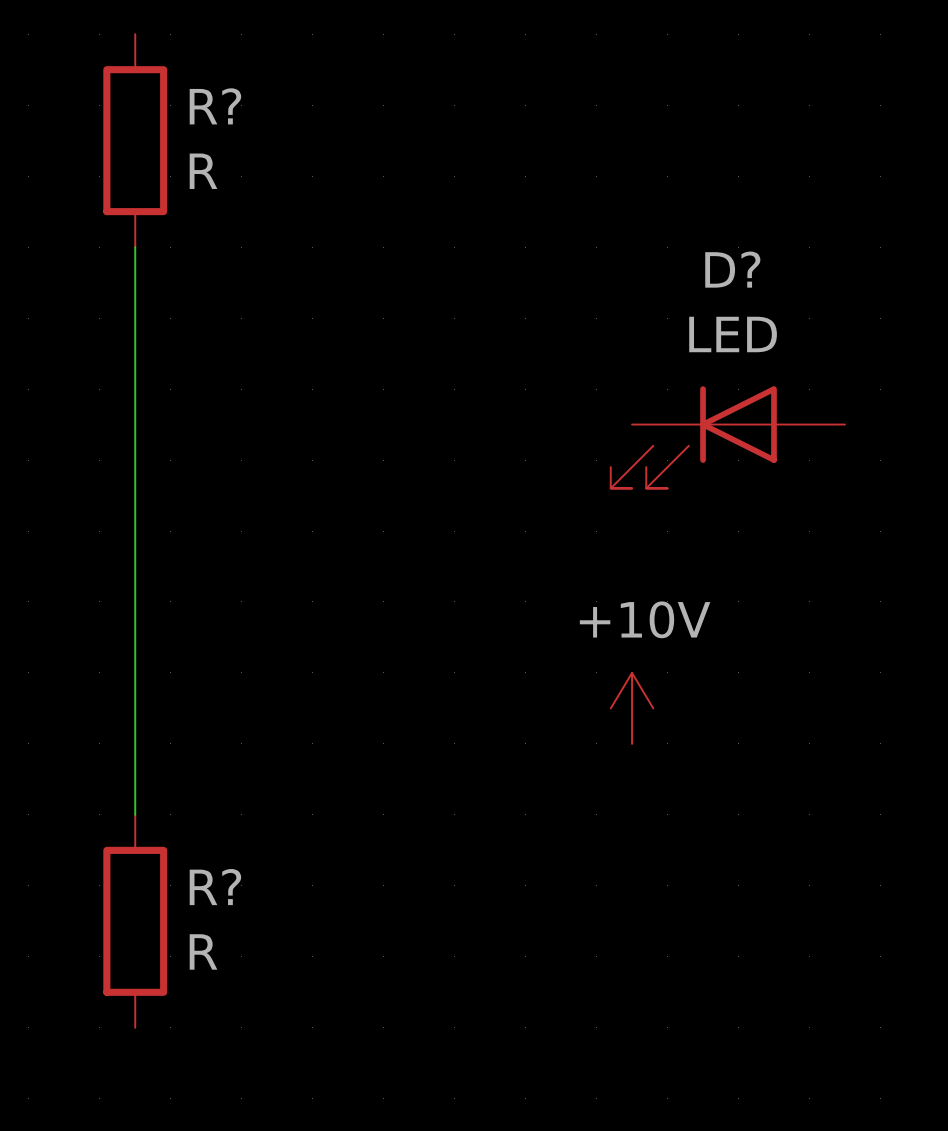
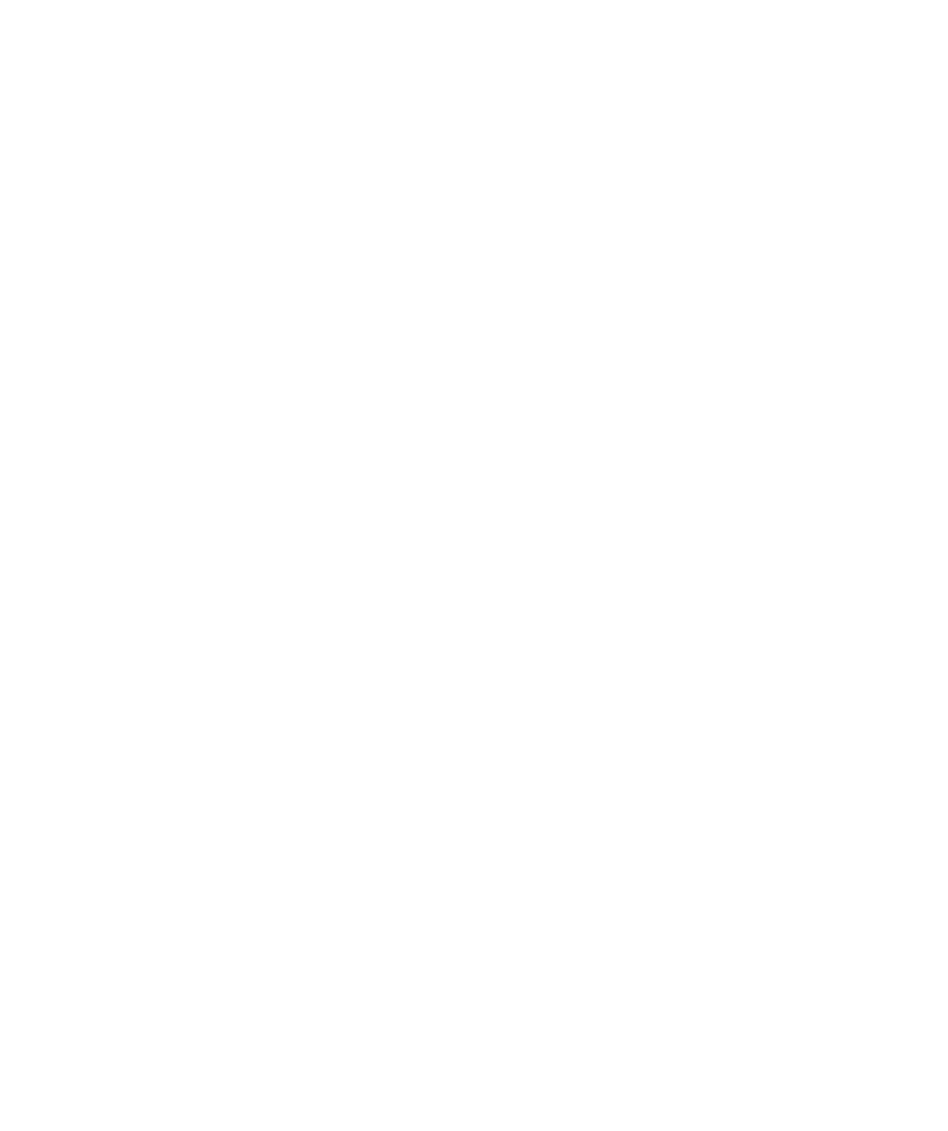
R?: R (135, 140) -> none
wire: (135, 247) (135, 814) -> none
D?: LED (727, 437) -> none
power symbol: +10V (632, 708) -> none
R?: R (135, 921) -> none

